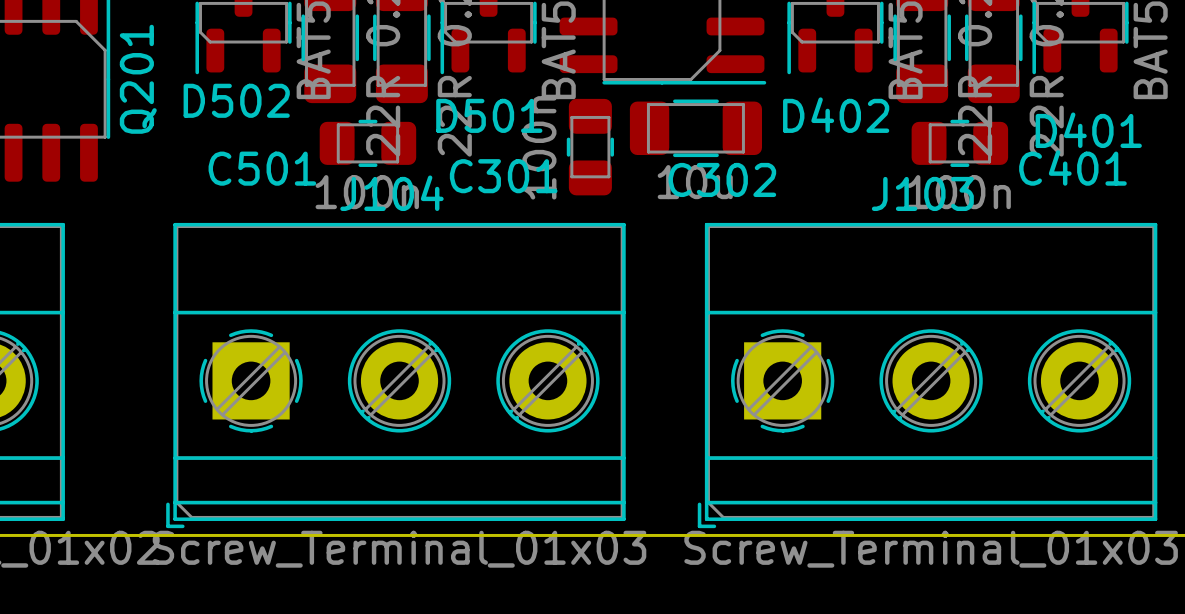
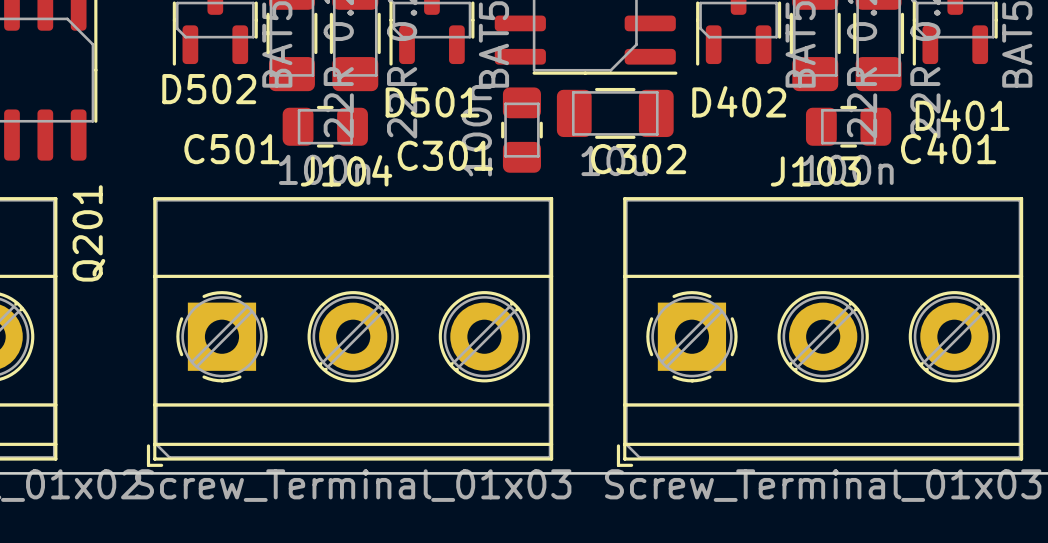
Q201 name position: Q201 (138, 79) -> Q201 (88, 233)

